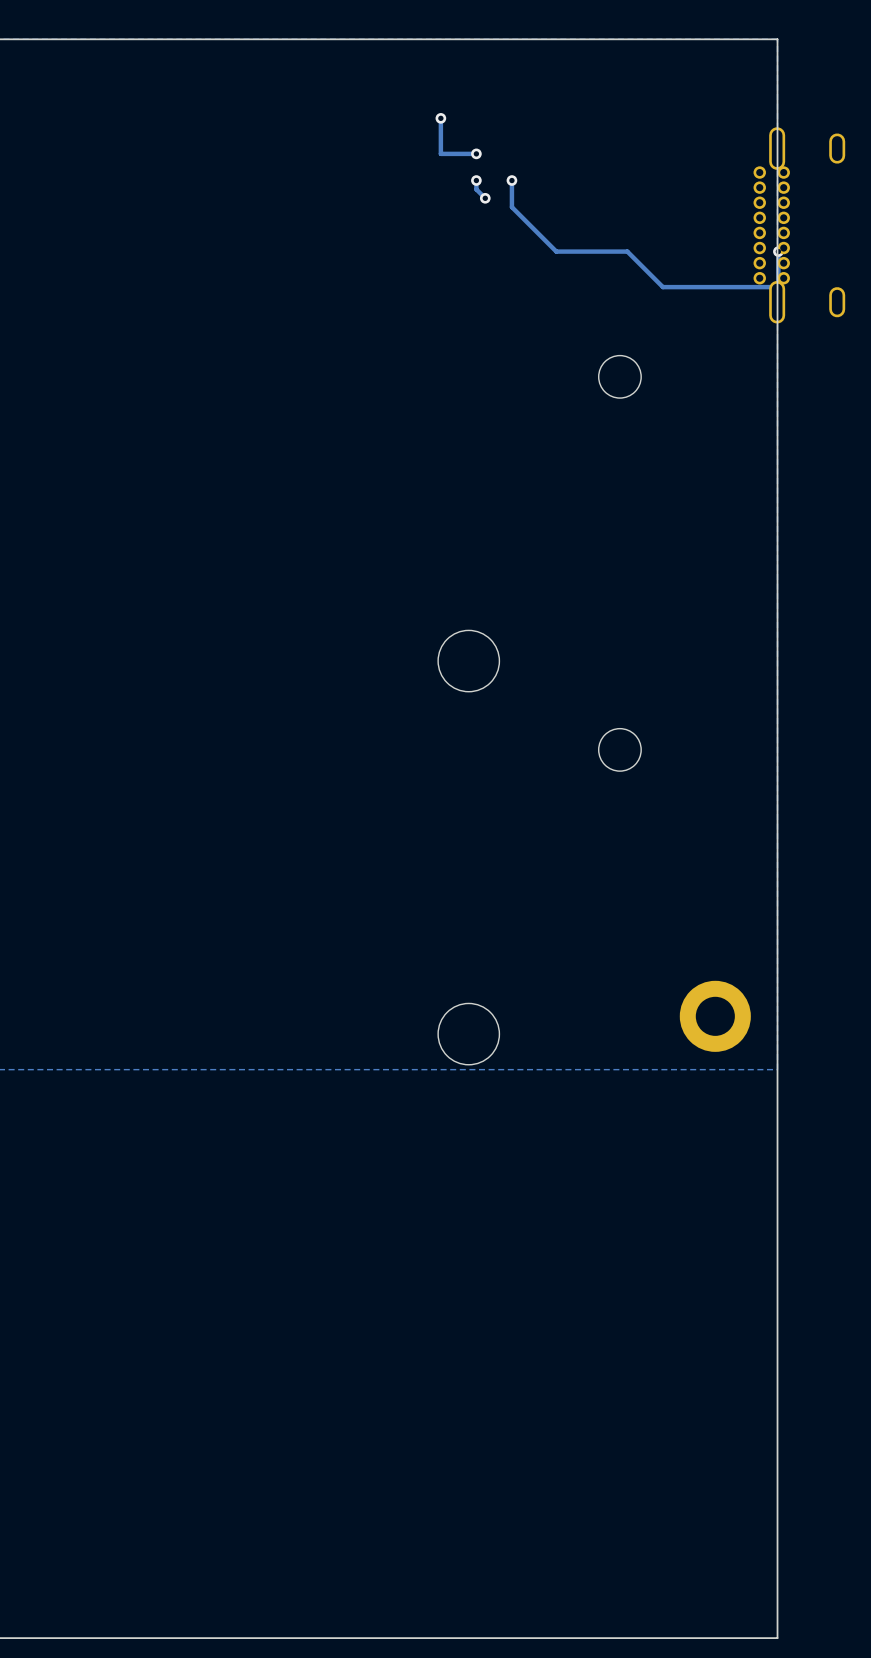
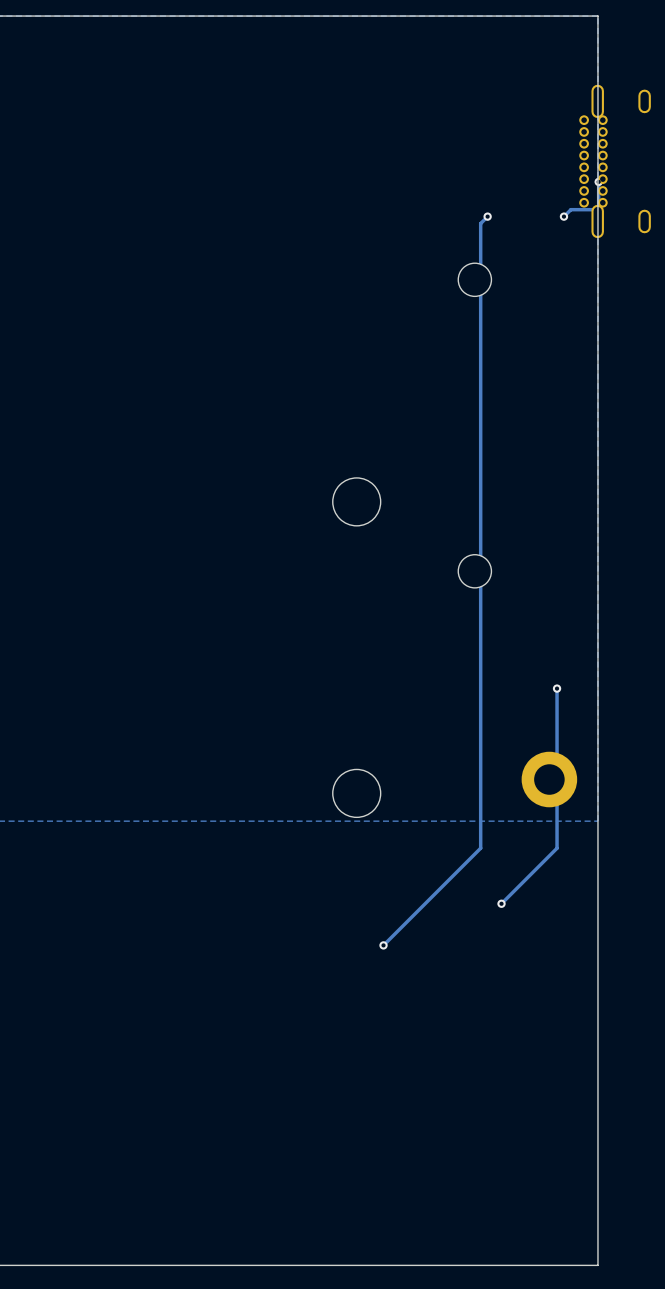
track: (440, 118) (440, 153) (476, 153) -> none
via: (440, 118) -> none
via: (476, 153) -> none
track: (476, 180) (476, 189) (485, 198) -> none
via: (476, 180) -> none
track: (511, 180) (511, 207) (556, 251) (627, 251) (662, 287) (742, 287) -> (563, 216) (570, 209)
via: (511, 180) -> none
via: (485, 198) -> none
track: none -> (487, 216) (480, 223) (480, 848) (383, 945)
via: none -> (487, 216)
via: none -> (563, 216)
track: none -> (557, 688) (557, 848) (501, 903)
via: none -> (557, 688)
via: none -> (501, 903)
via: none -> (383, 945)

